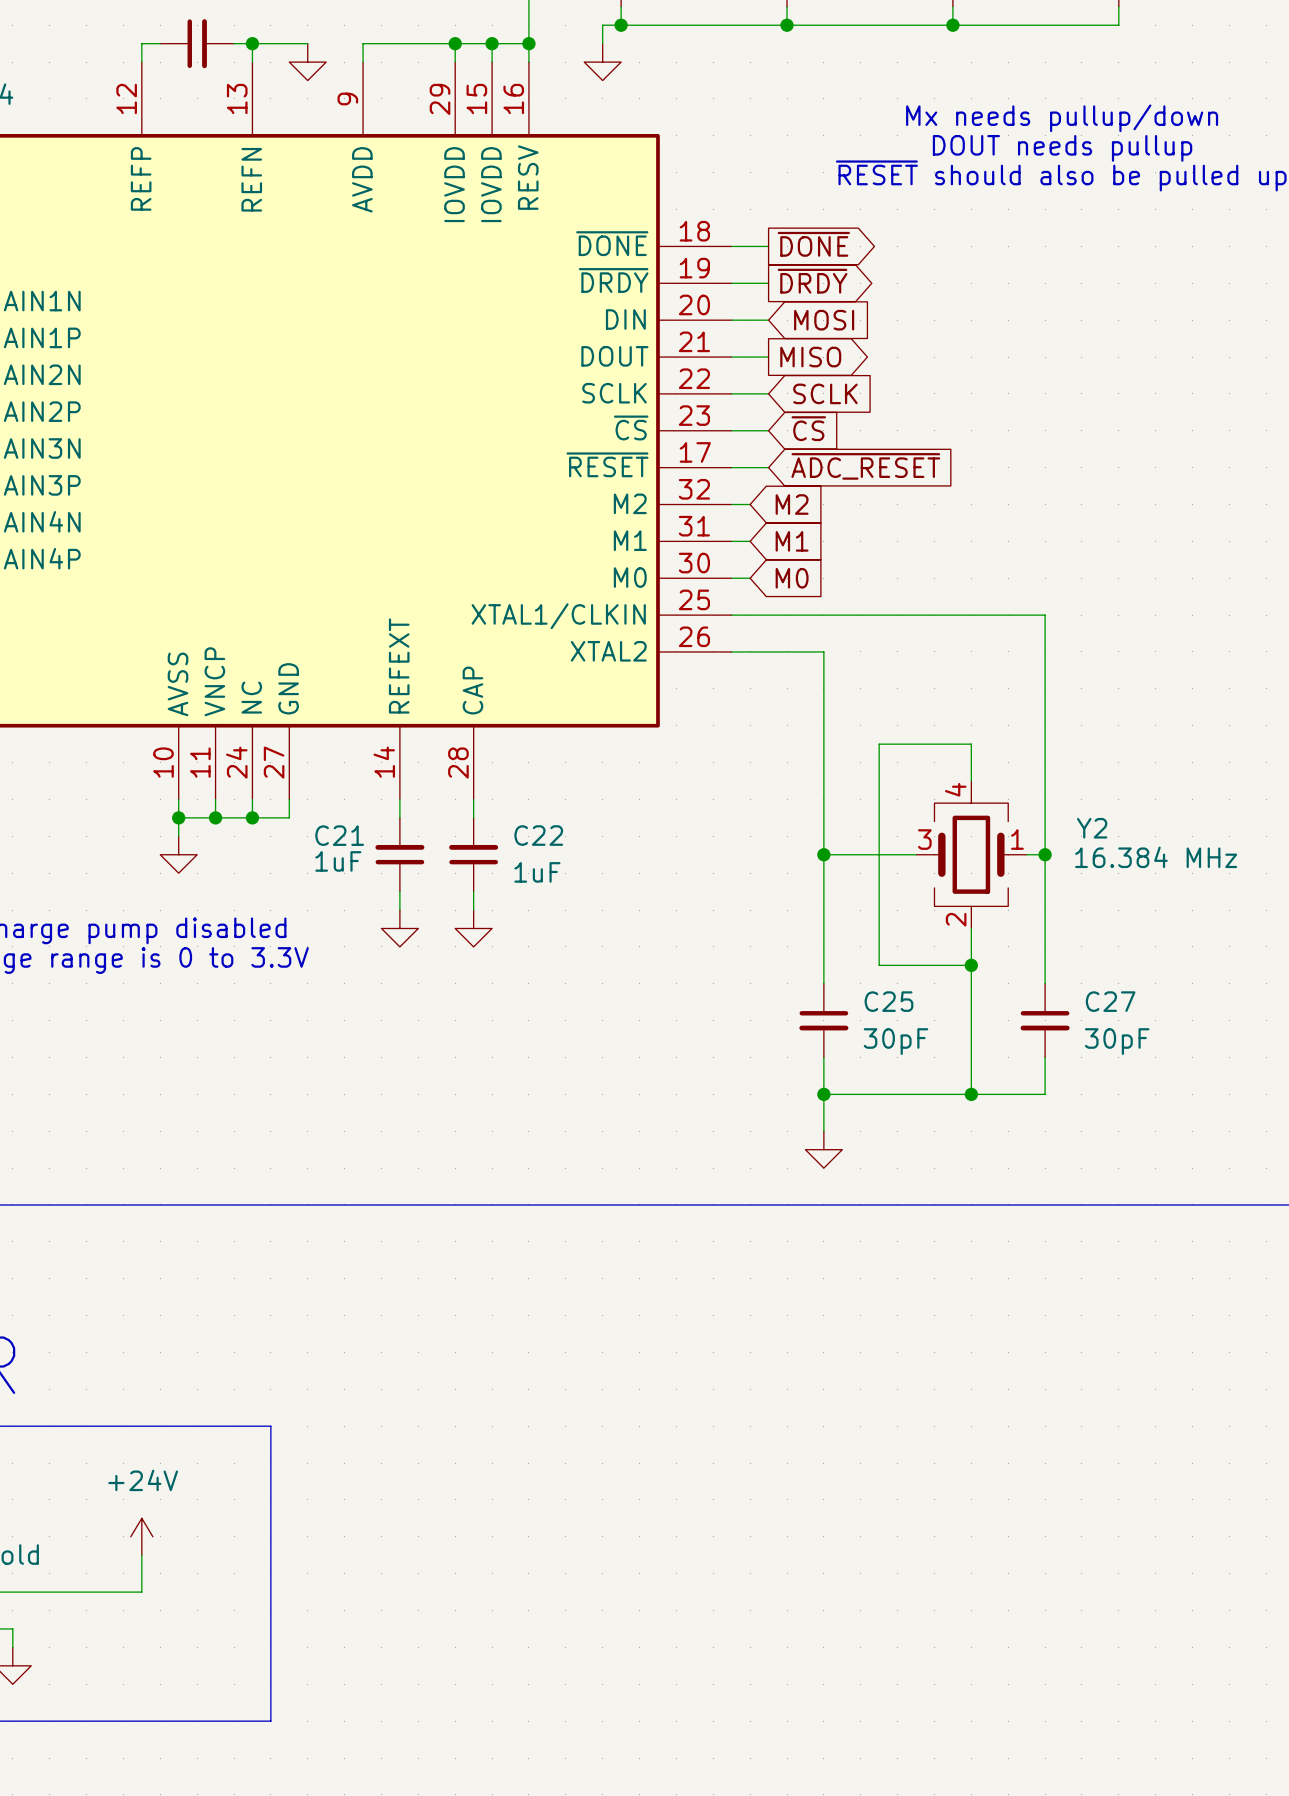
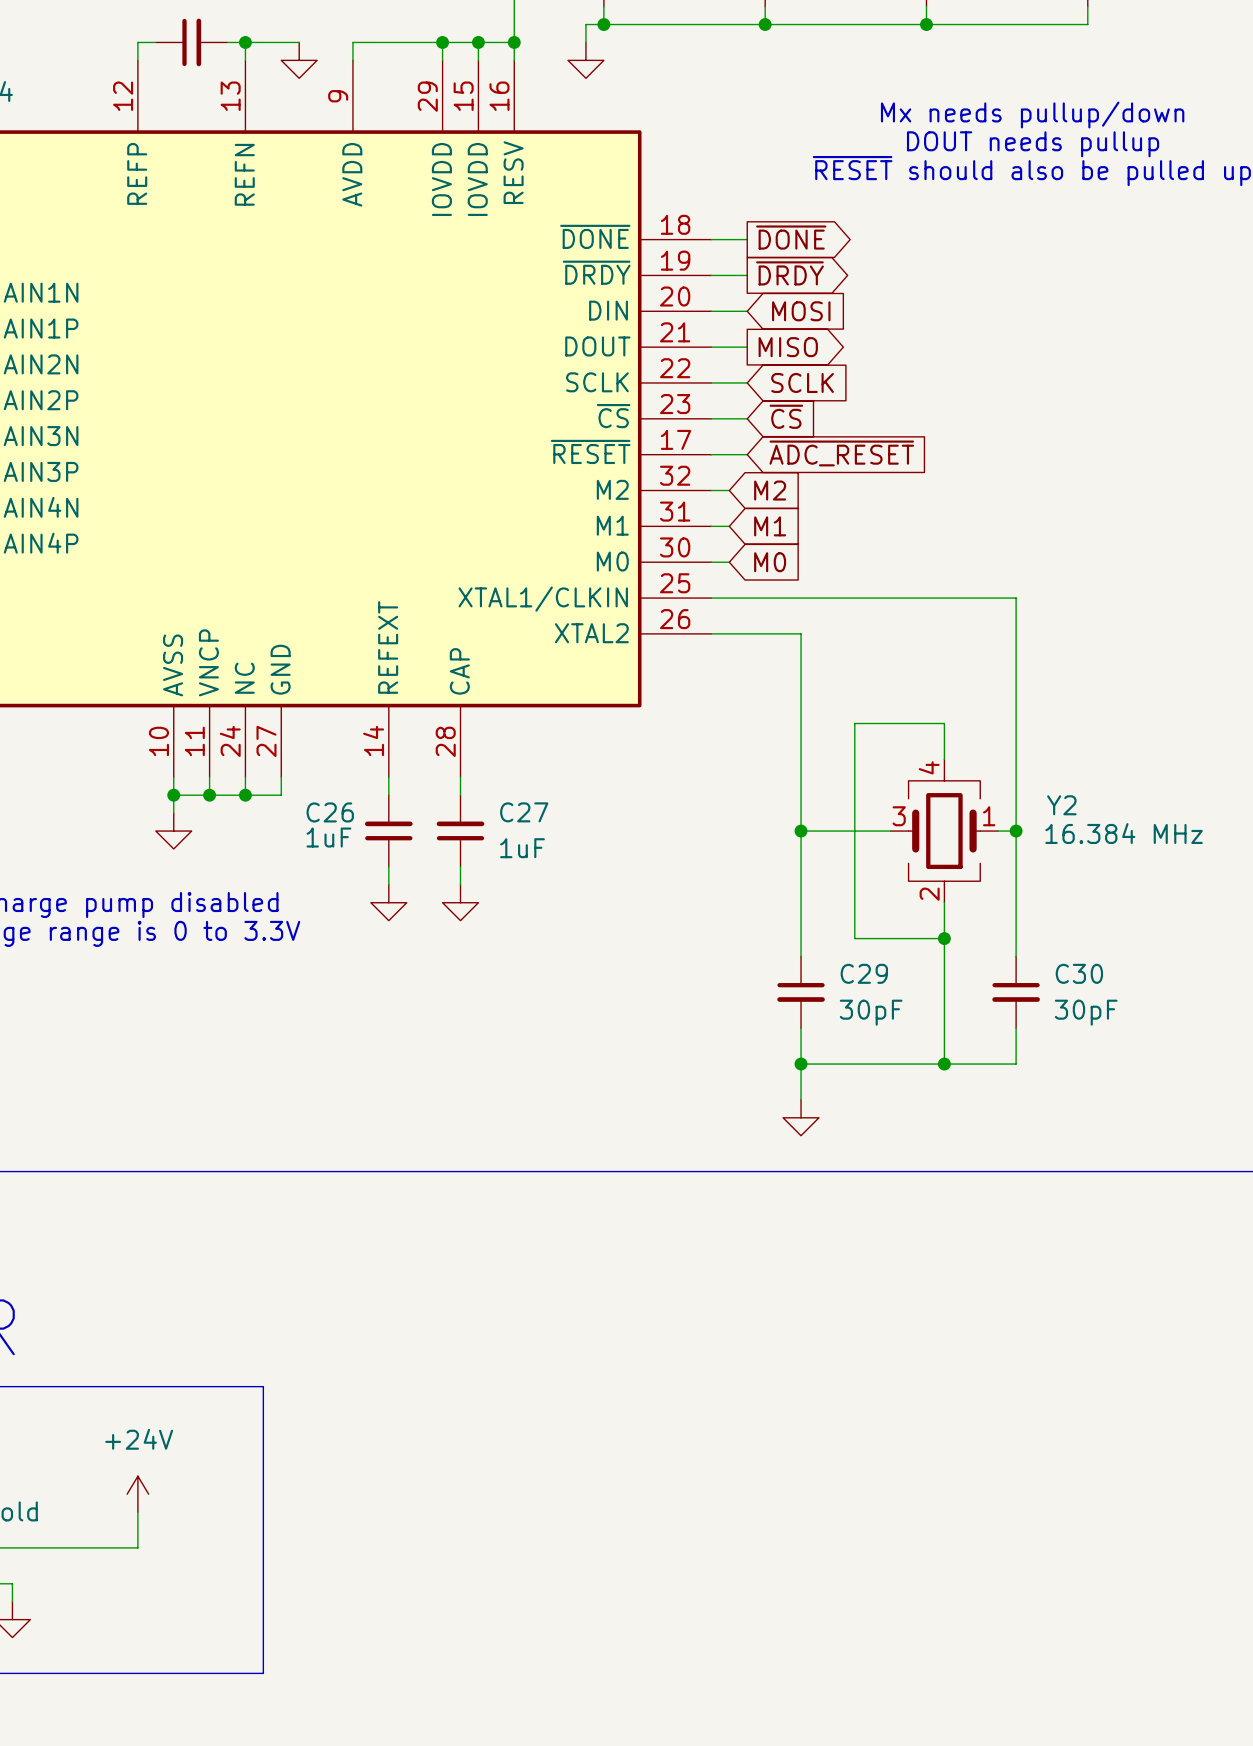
C21 name: C21 (339, 835) -> C26 (330, 812)
C22 name: C22 (538, 835) -> C27 (524, 812)
C25 name: C25 (888, 1001) -> C29 (864, 973)
C27 name: C27 (1110, 1001) -> C30 (1079, 973)

